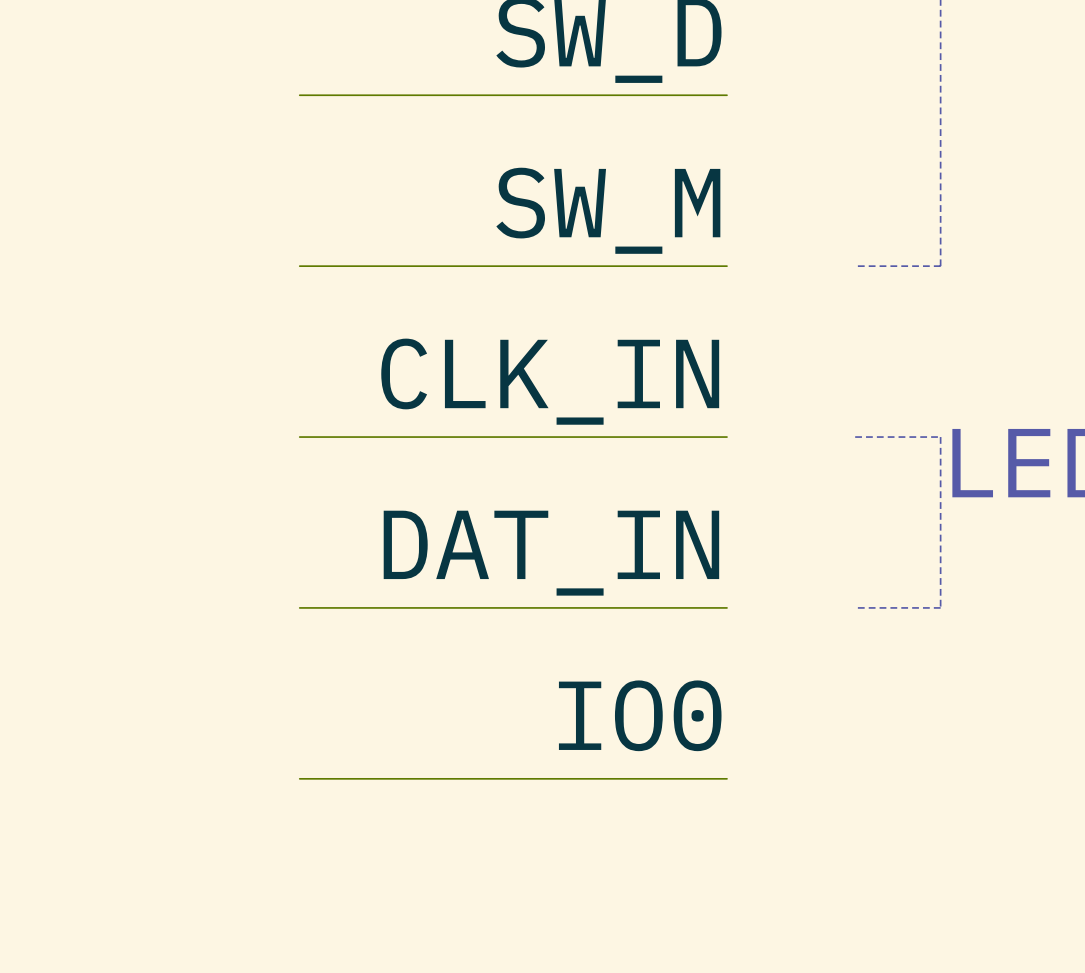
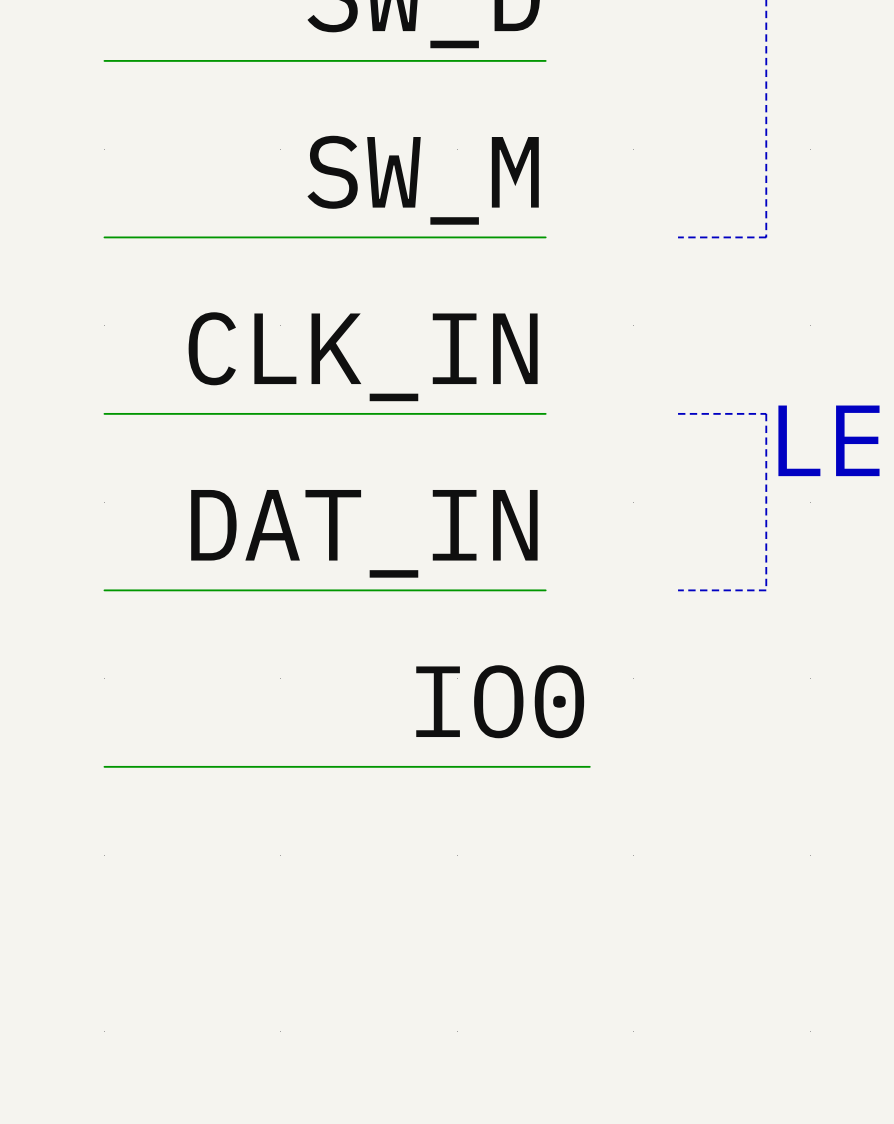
label position: IO0 (640, 715) -> IO0 (500, 701)
wire: none -> (545, 766) (589, 766)

